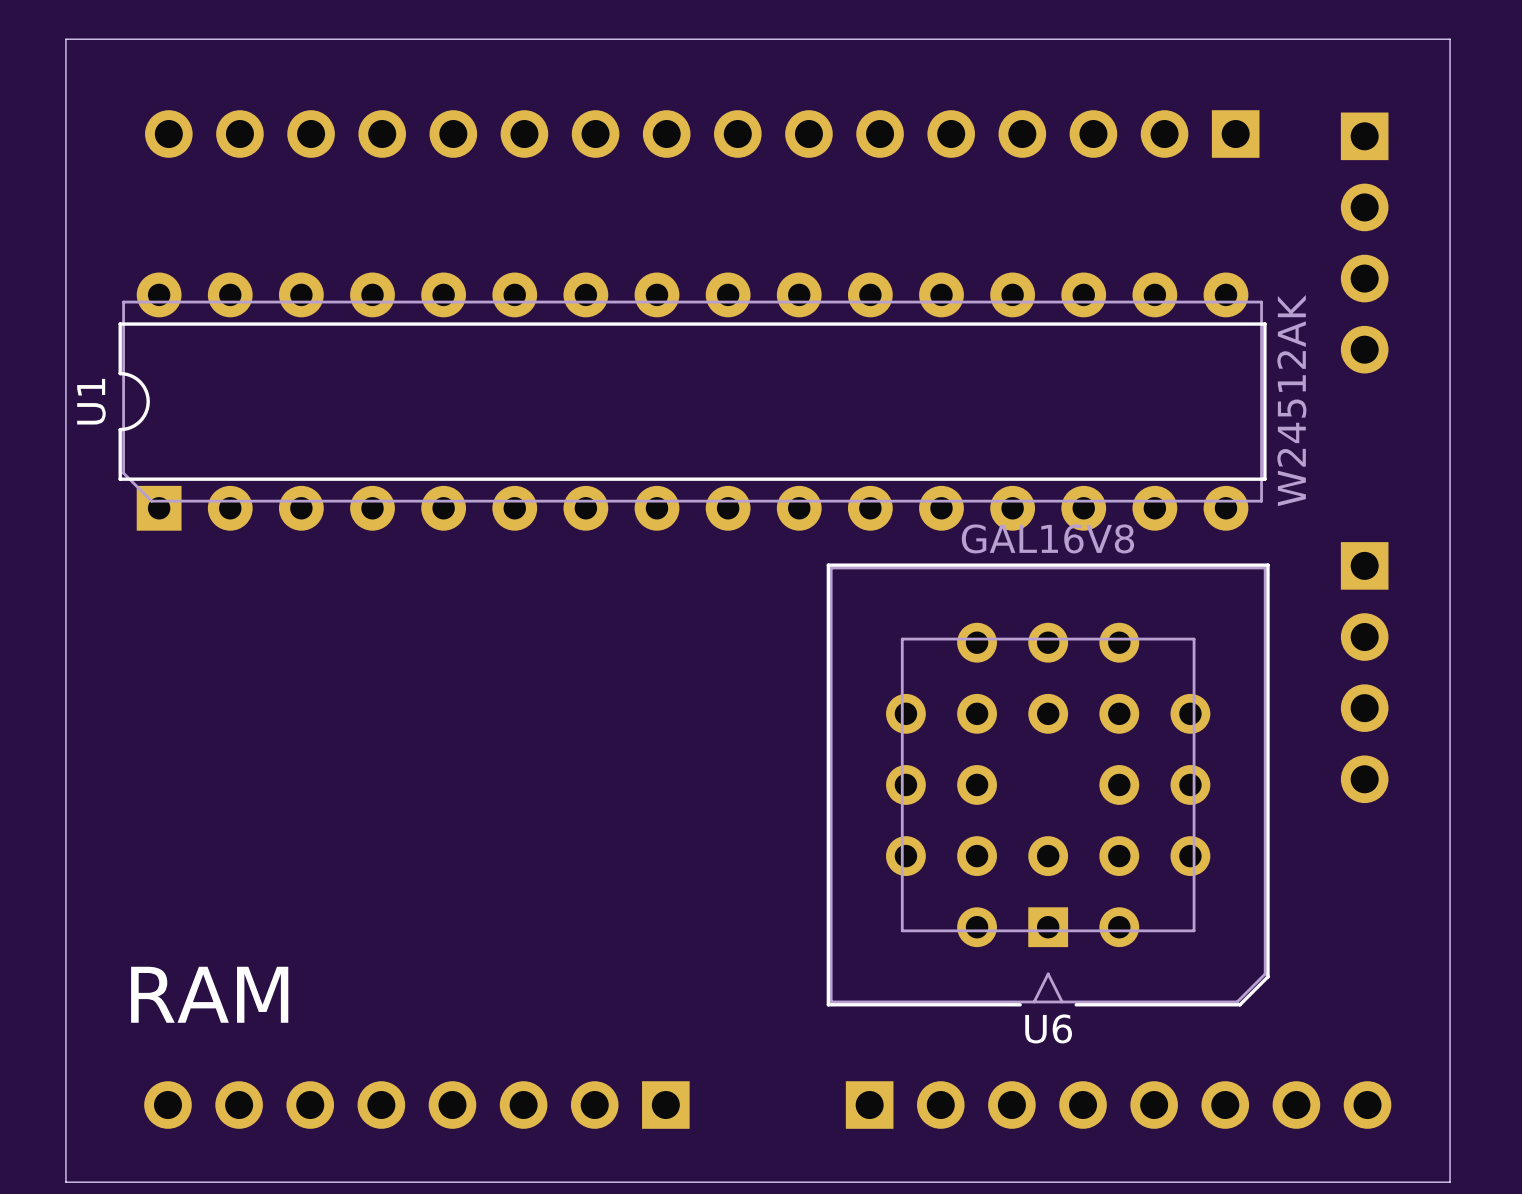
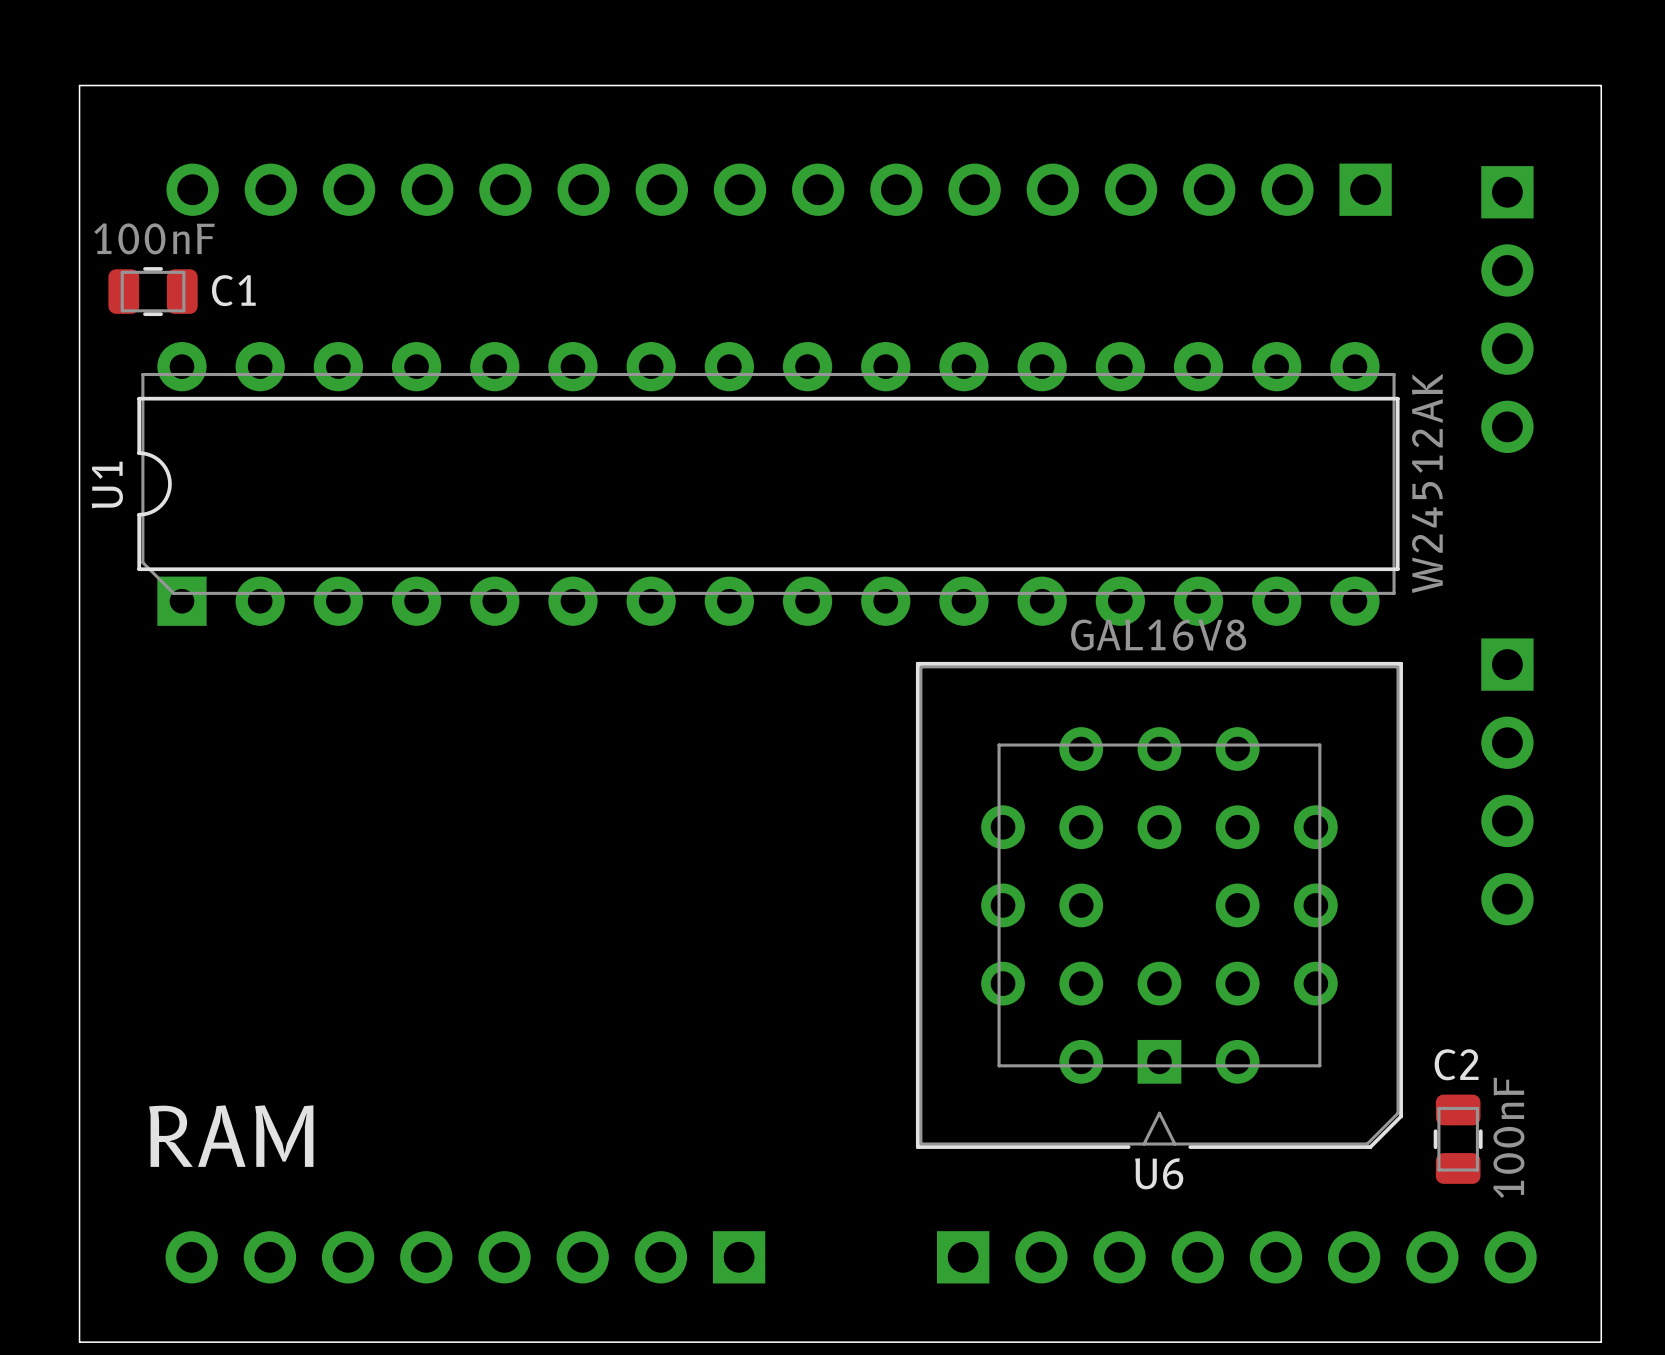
C1: none -> 100nF (153, 291)
C2: none -> 100nF (1458, 1139)

